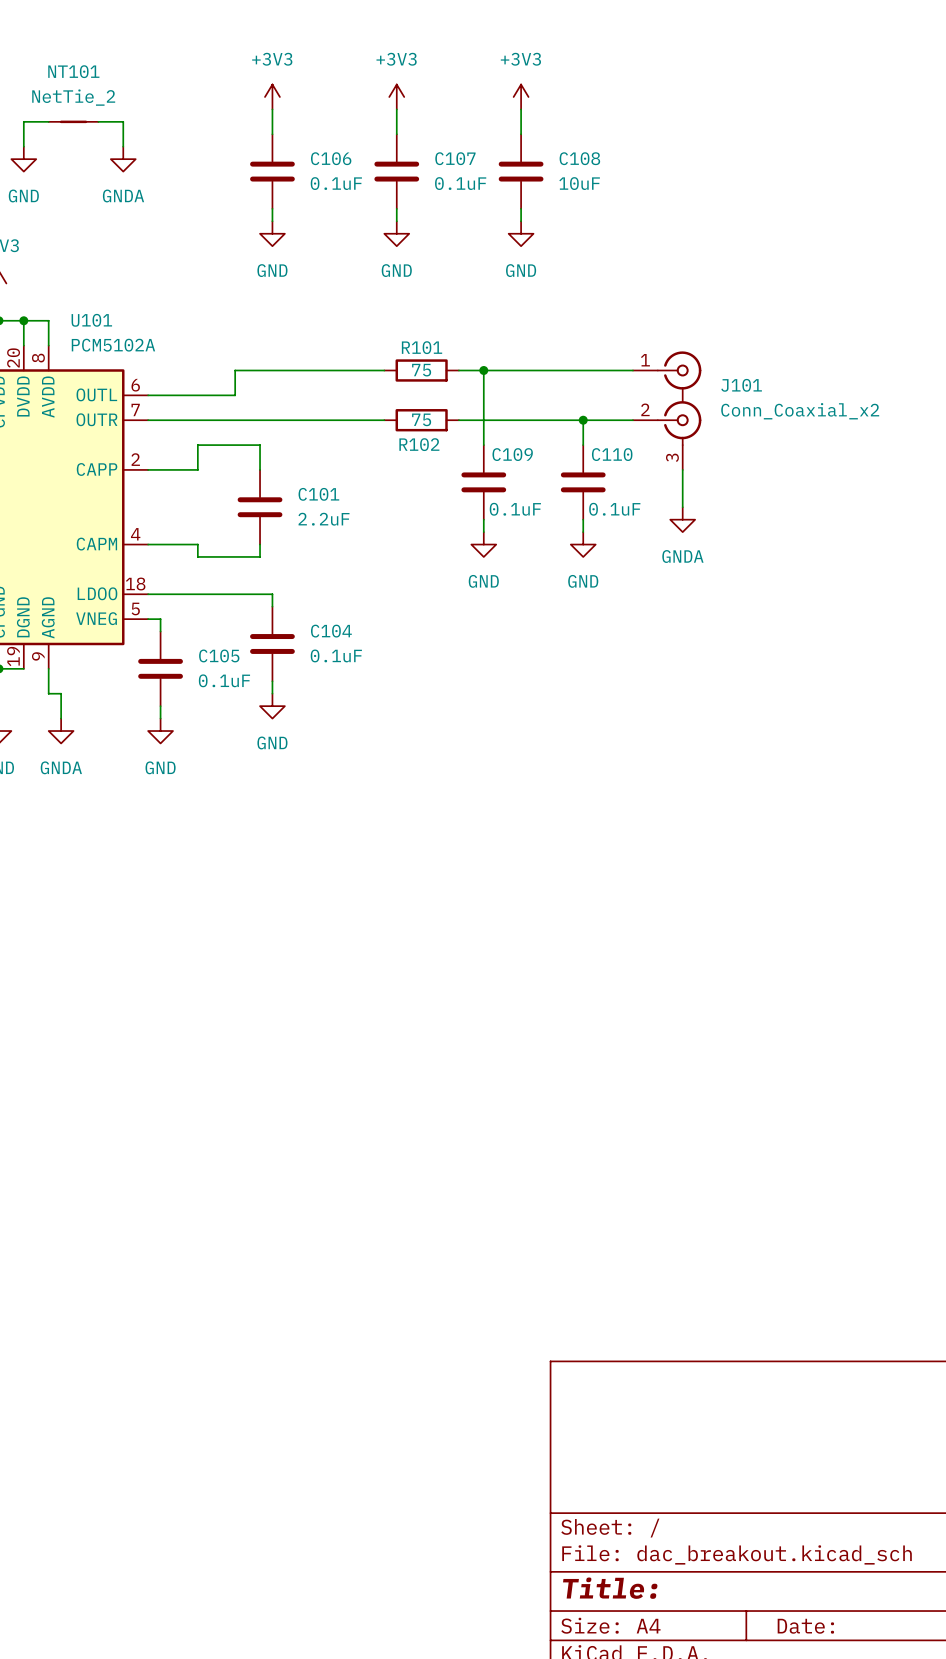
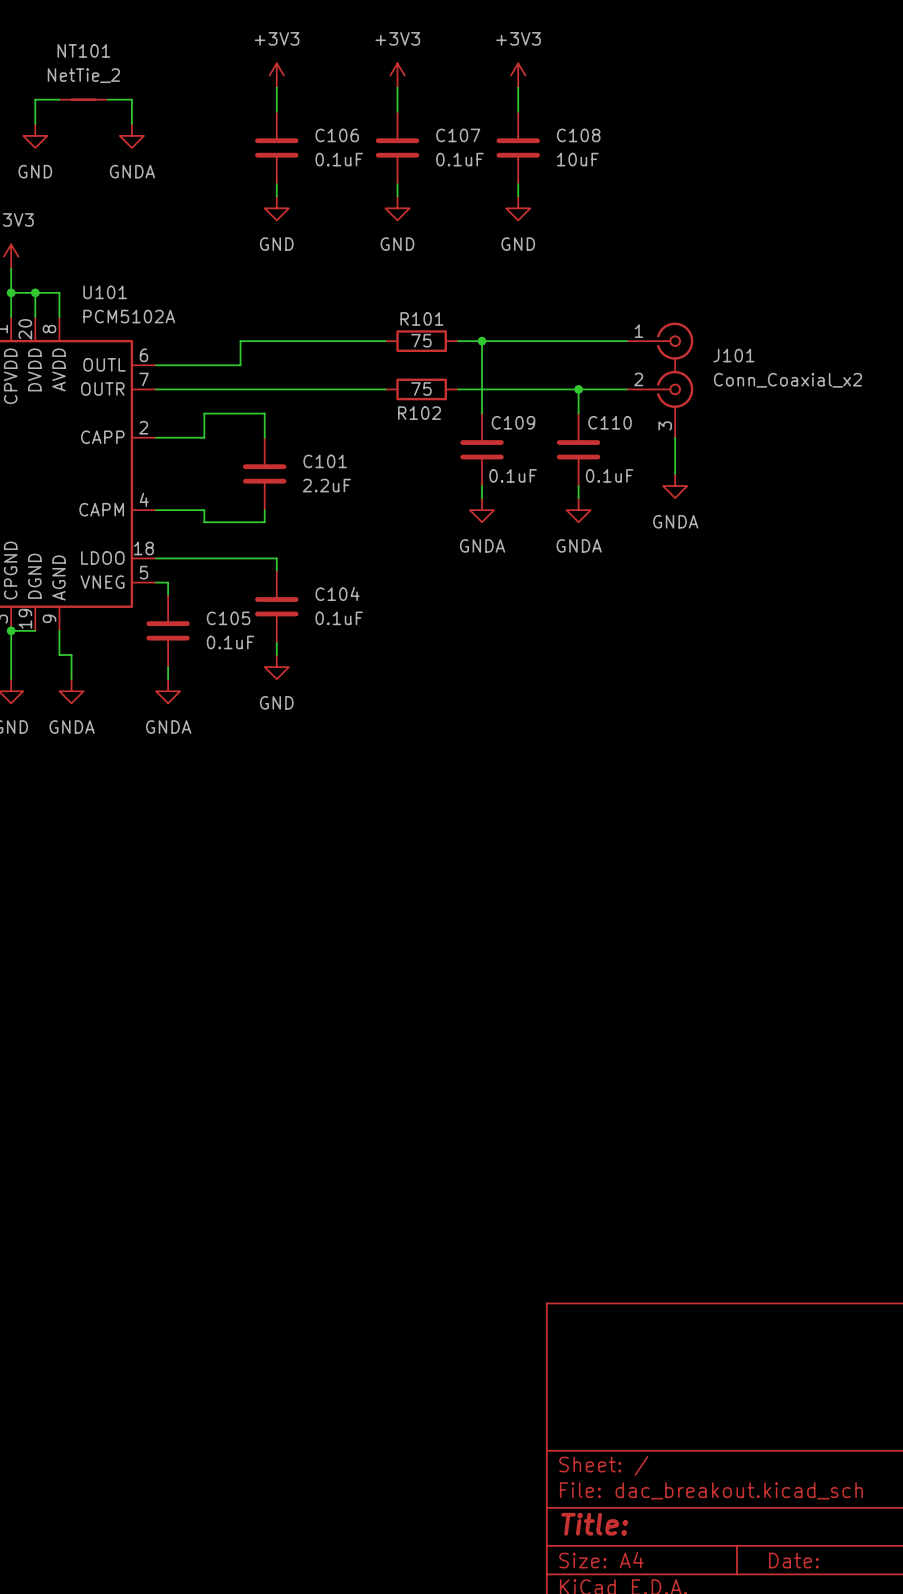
power symbol: GND (483, 544) -> GNDA (482, 510)
power symbol: GND (583, 544) -> GNDA (578, 510)
power symbol: GND (160, 731) -> GNDA (168, 691)

